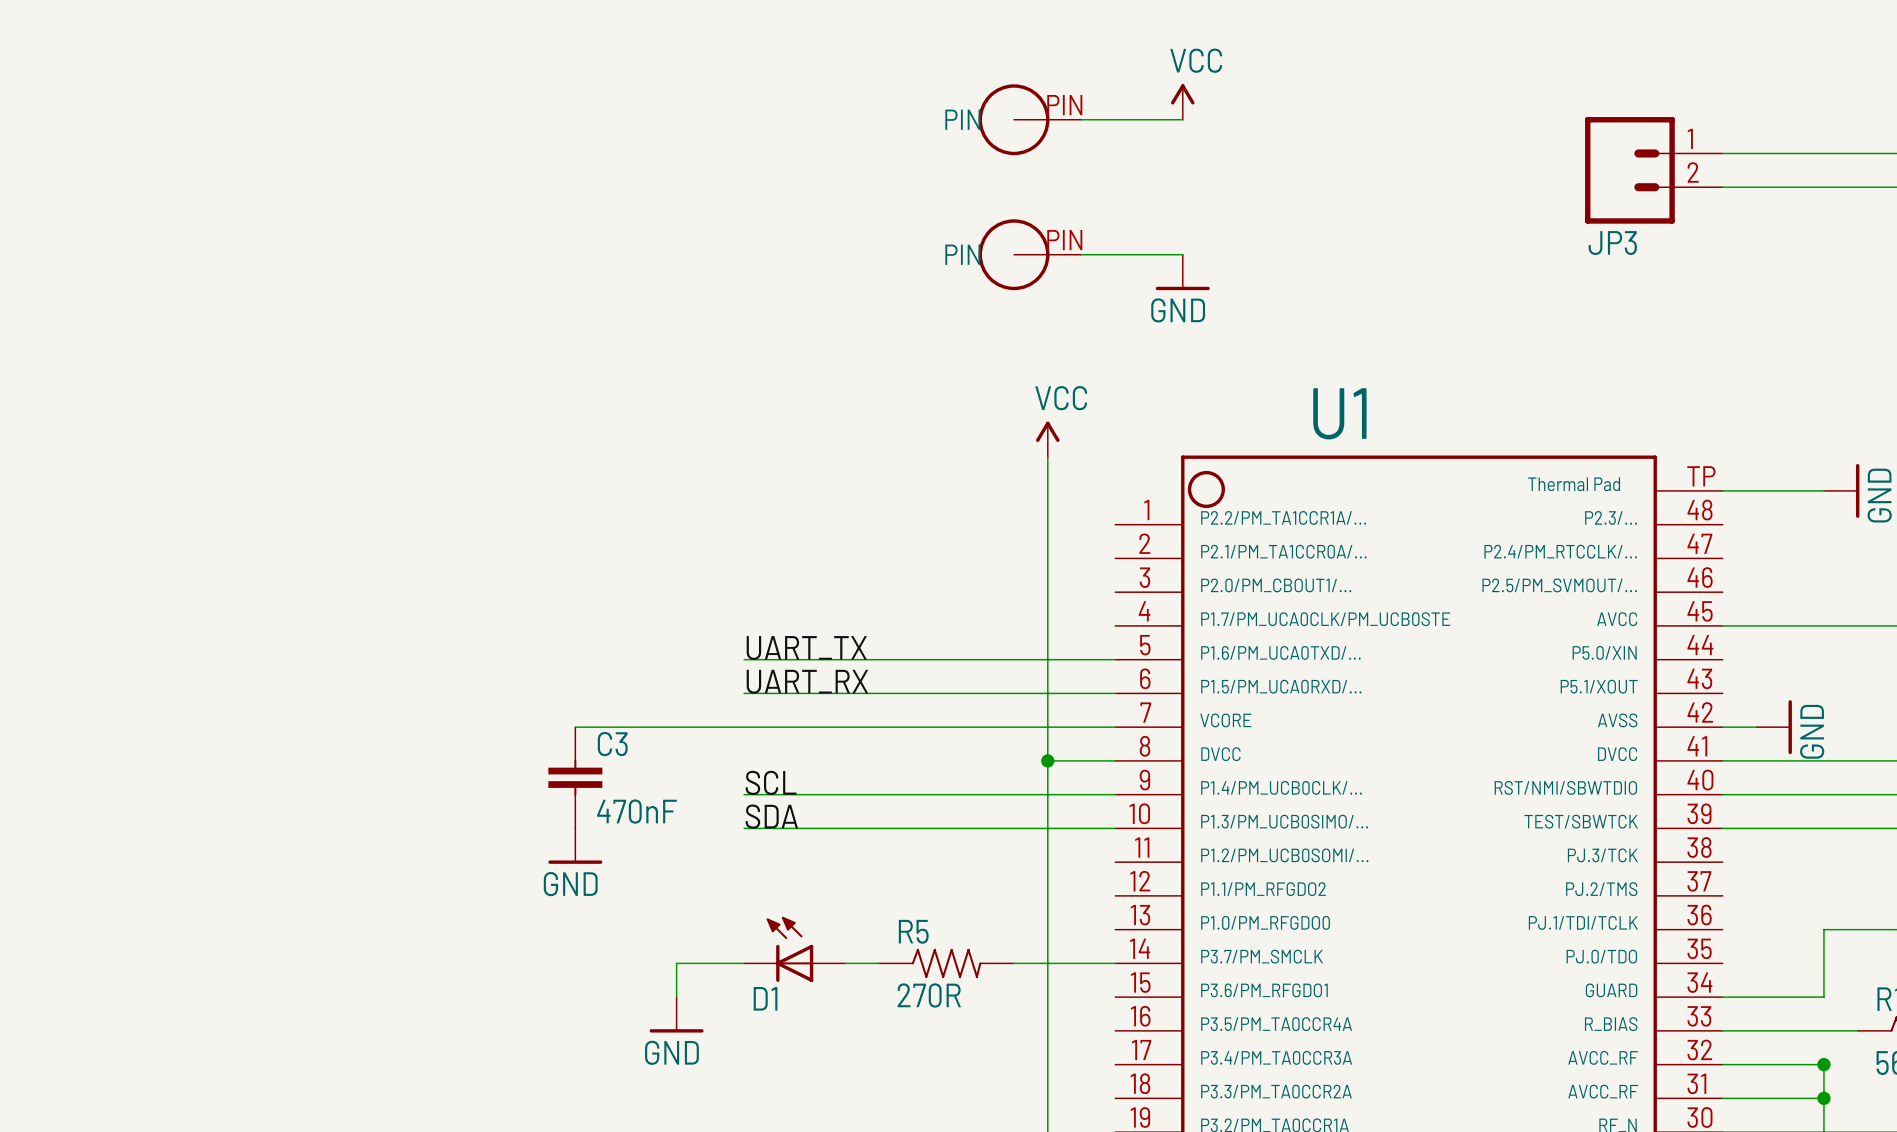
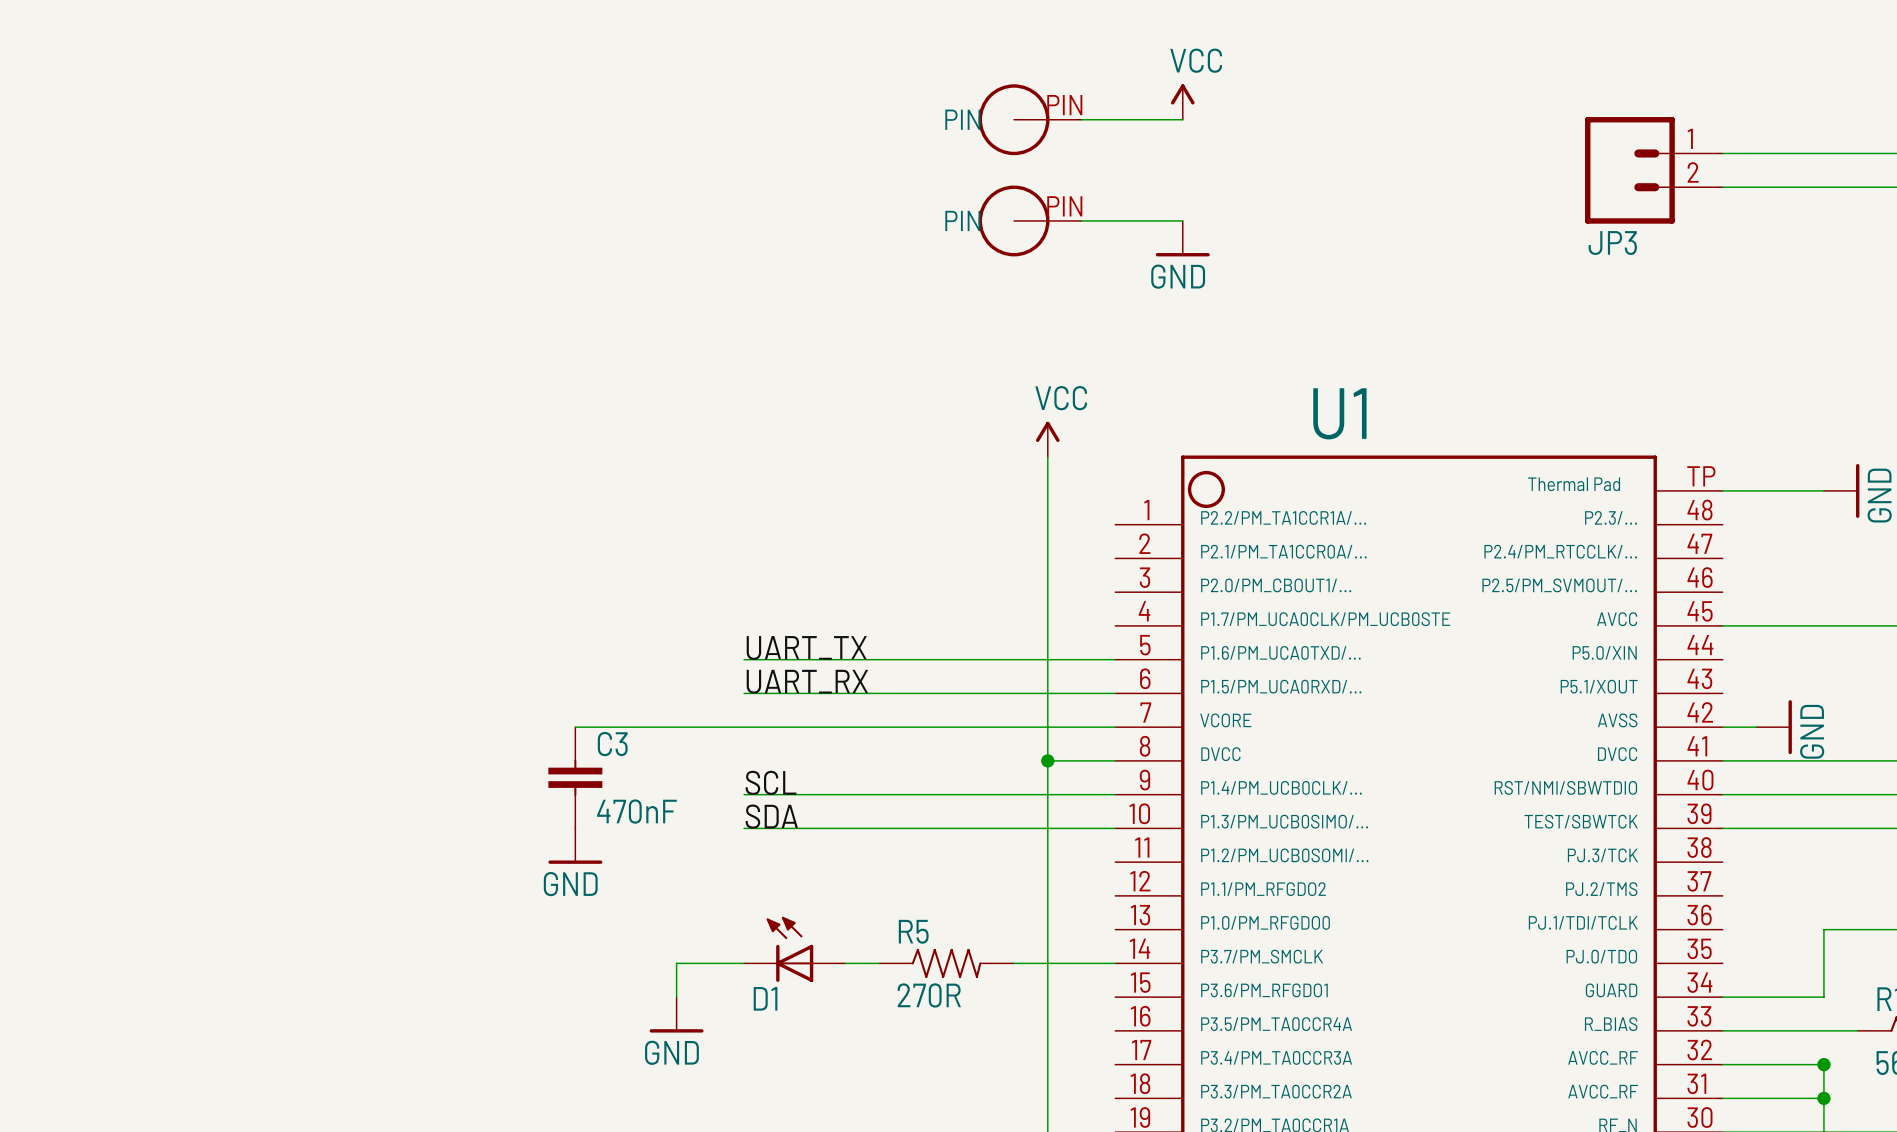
part position: (1030, 254) -> (1030, 220)
wire: (1081, 254) (1182, 254) -> (1081, 220) (1182, 220)
power symbol position: GND (1182, 272) -> GND (1182, 238)

